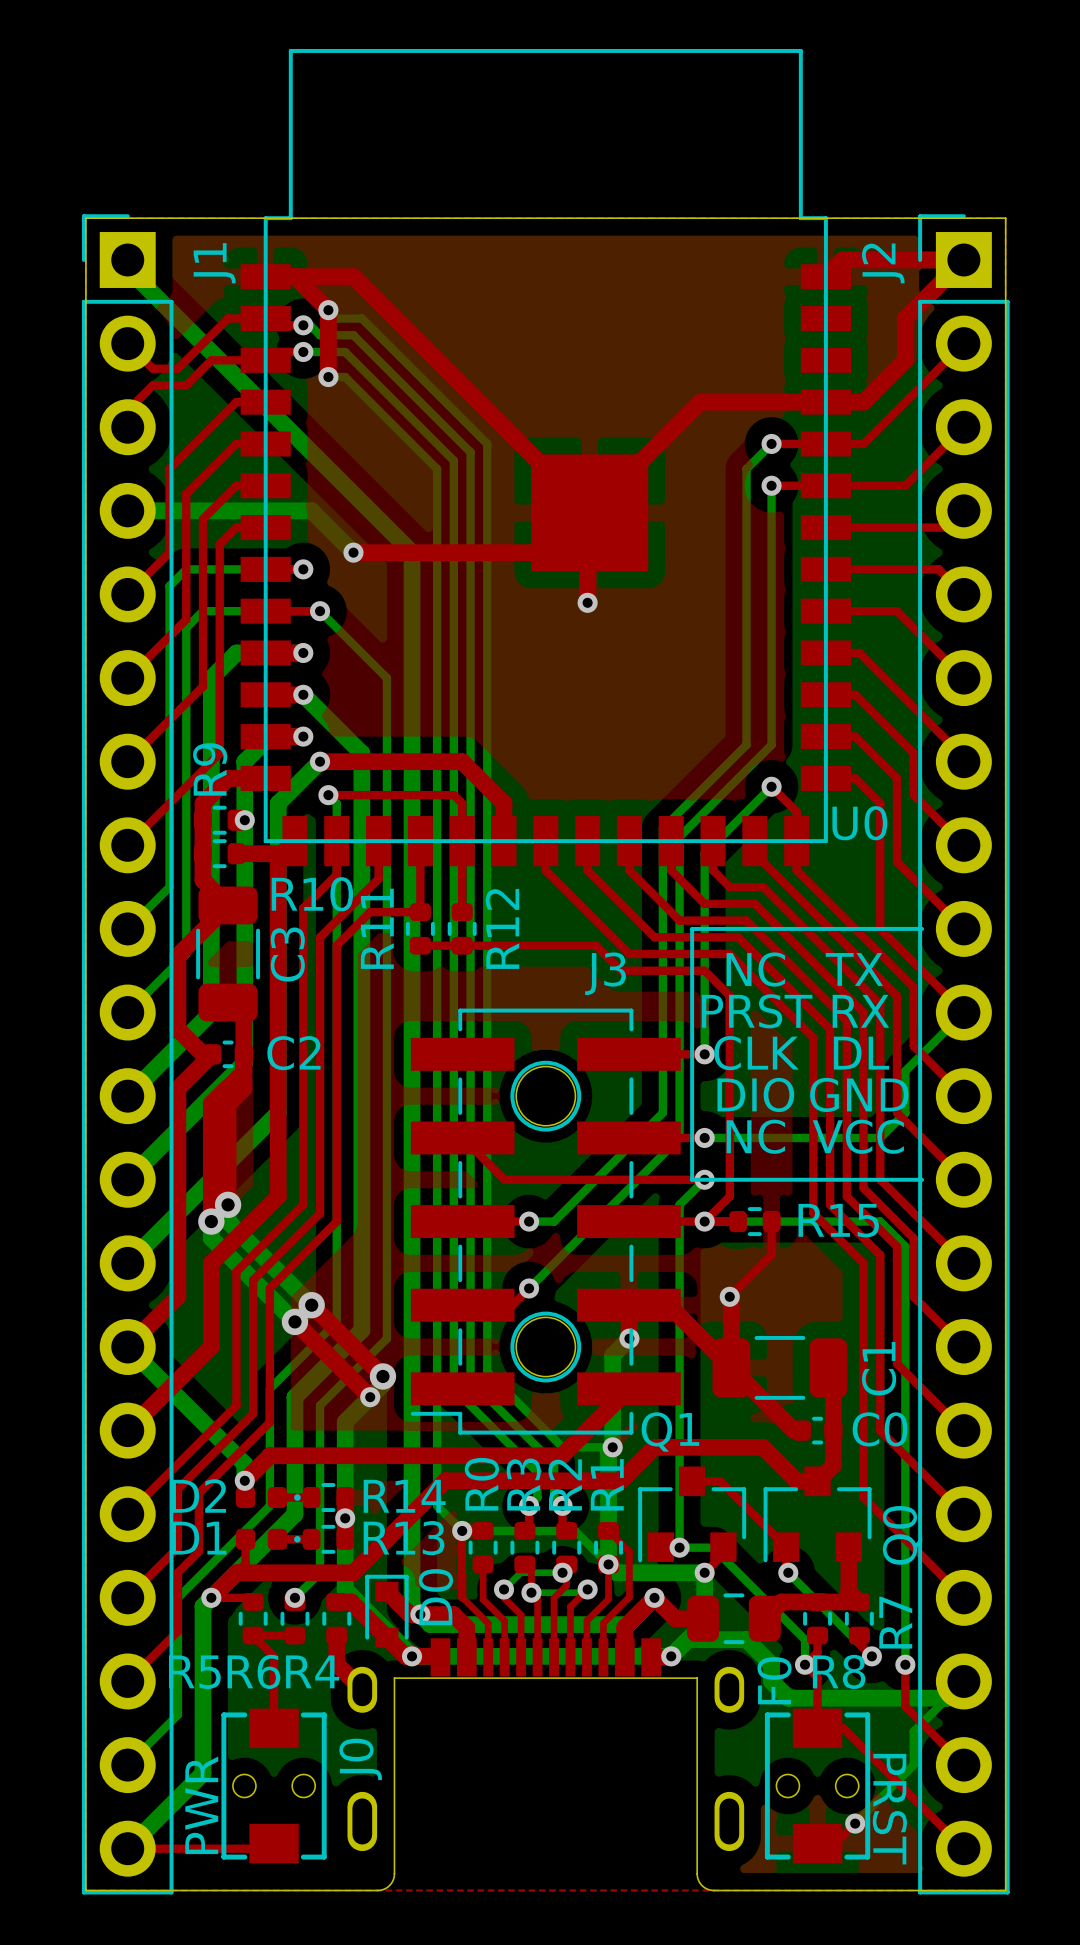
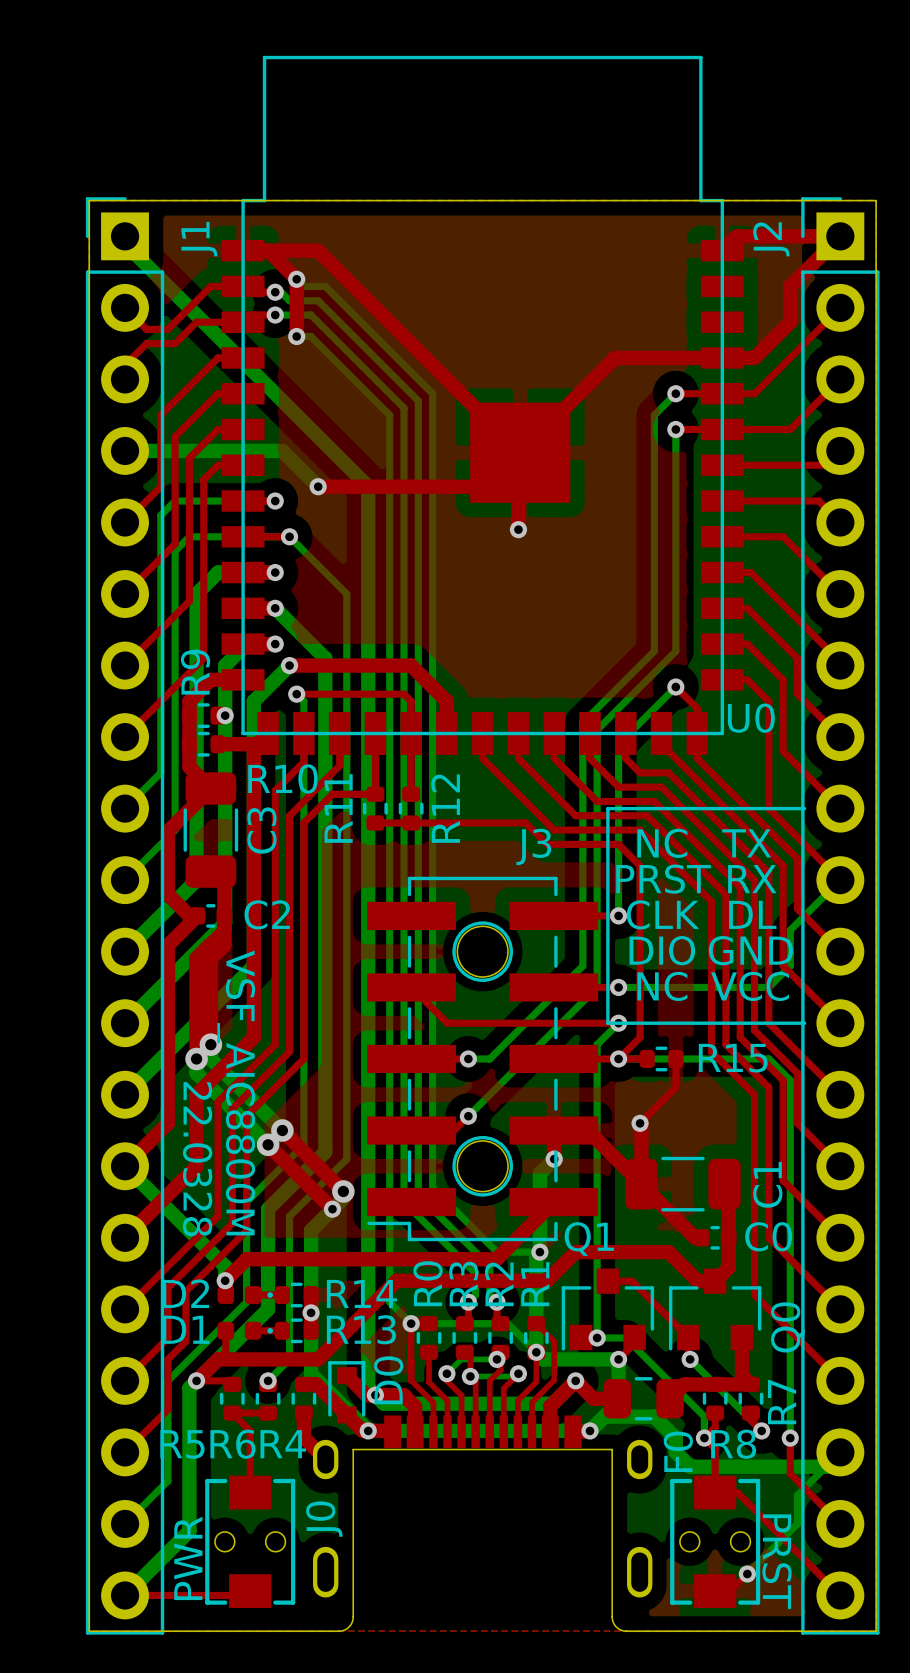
text: none -> VSF_AIC8800M (236, 1093)
text: none -> 22.0328 (197, 1159)

